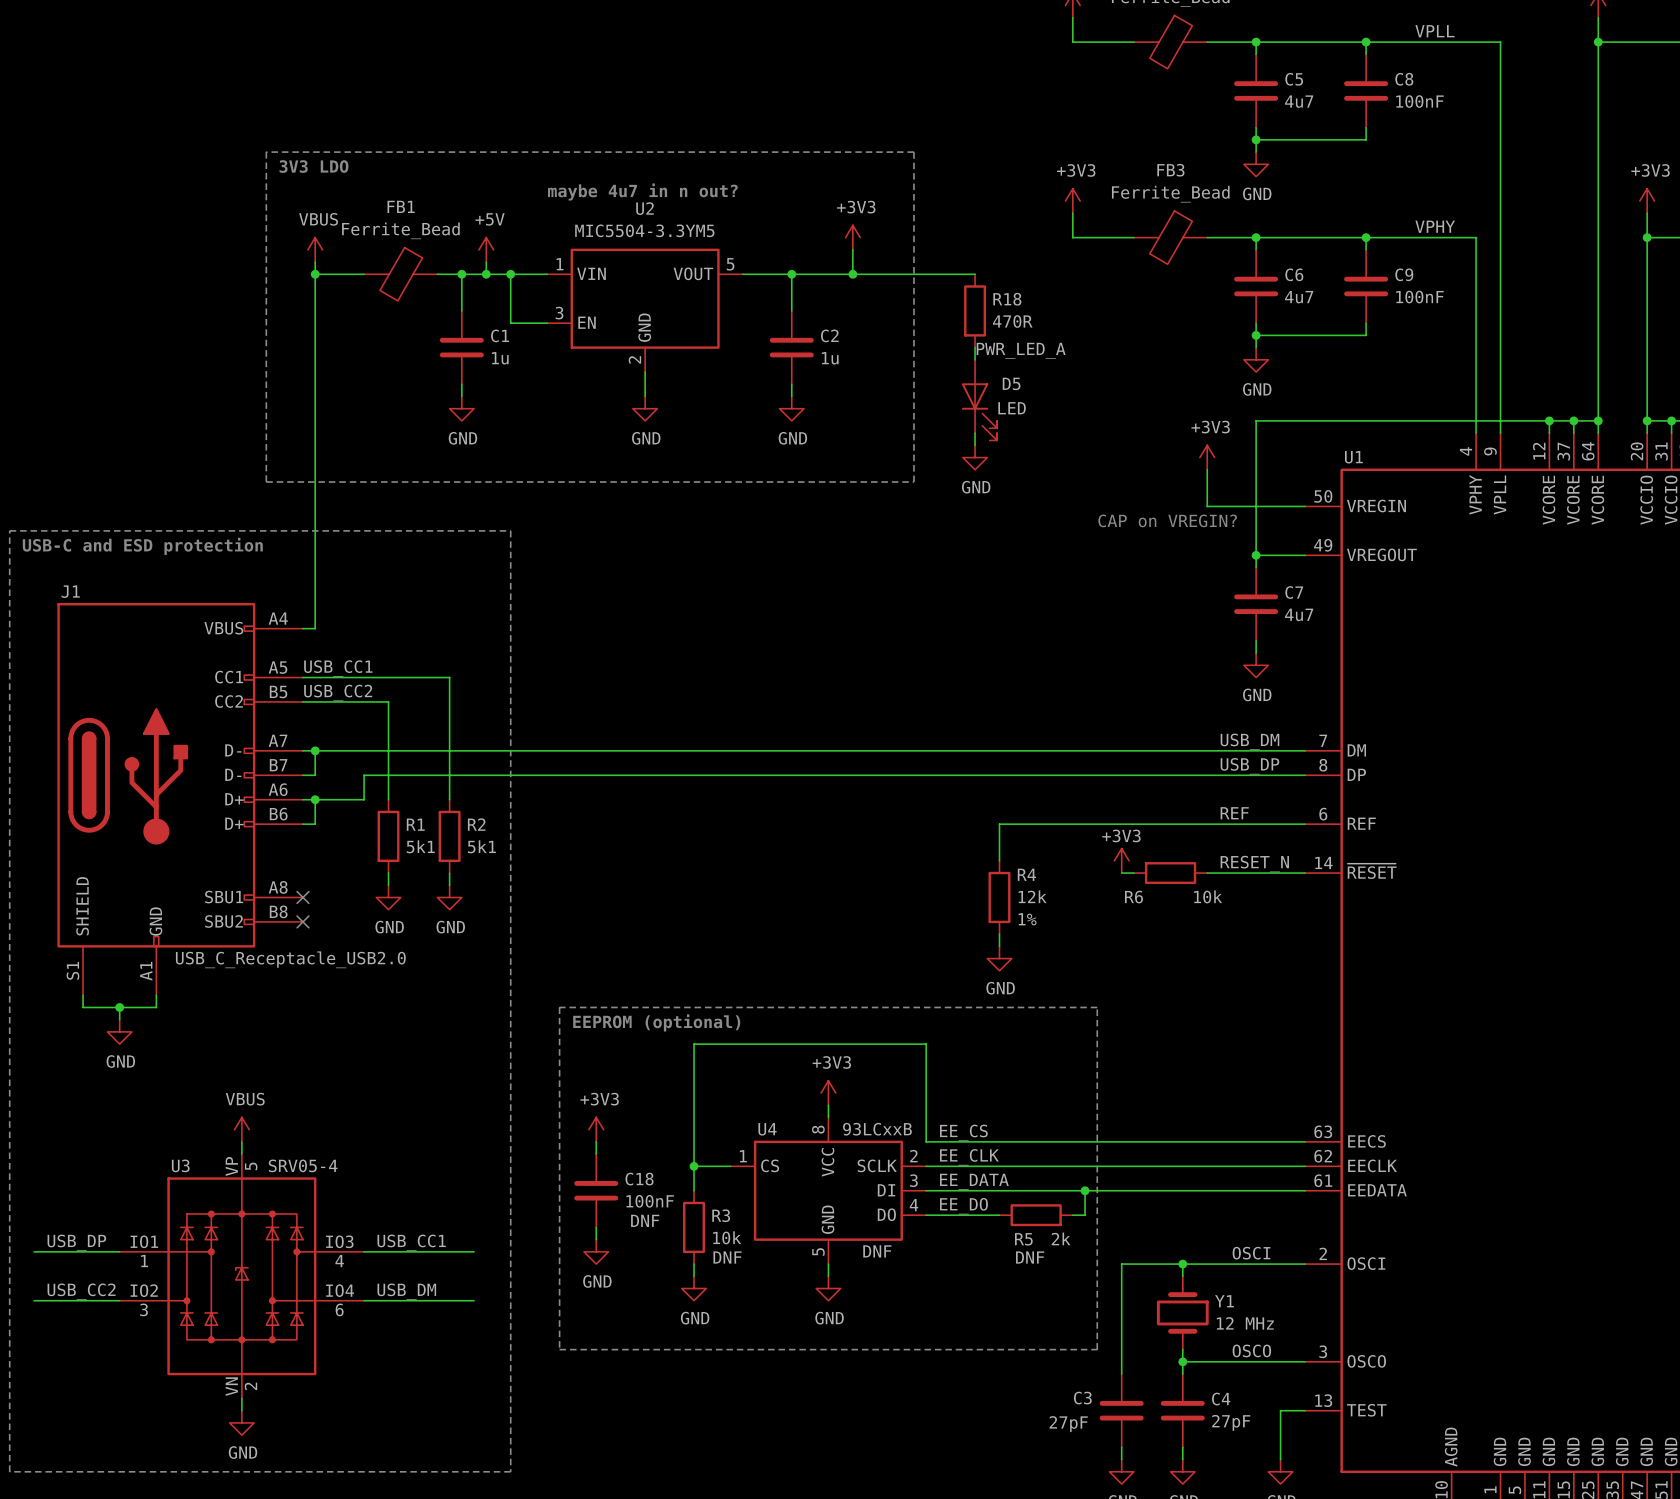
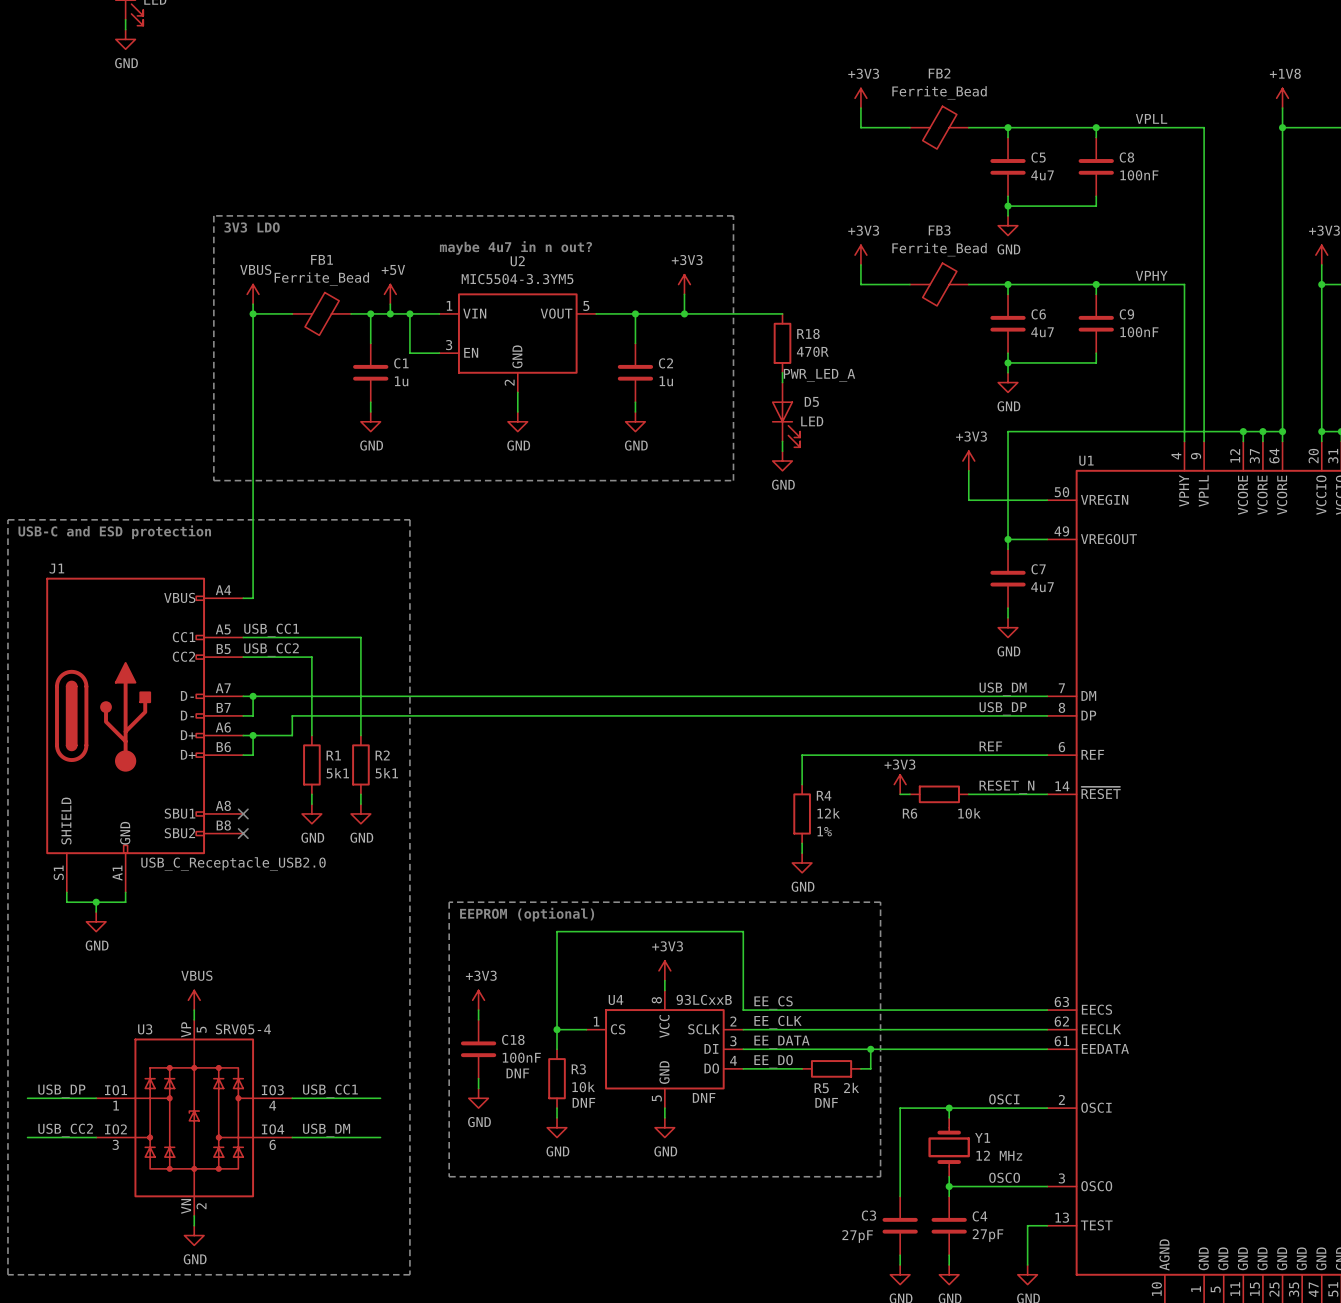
text: CAP on VREGIN? (1167, 520) -> none

